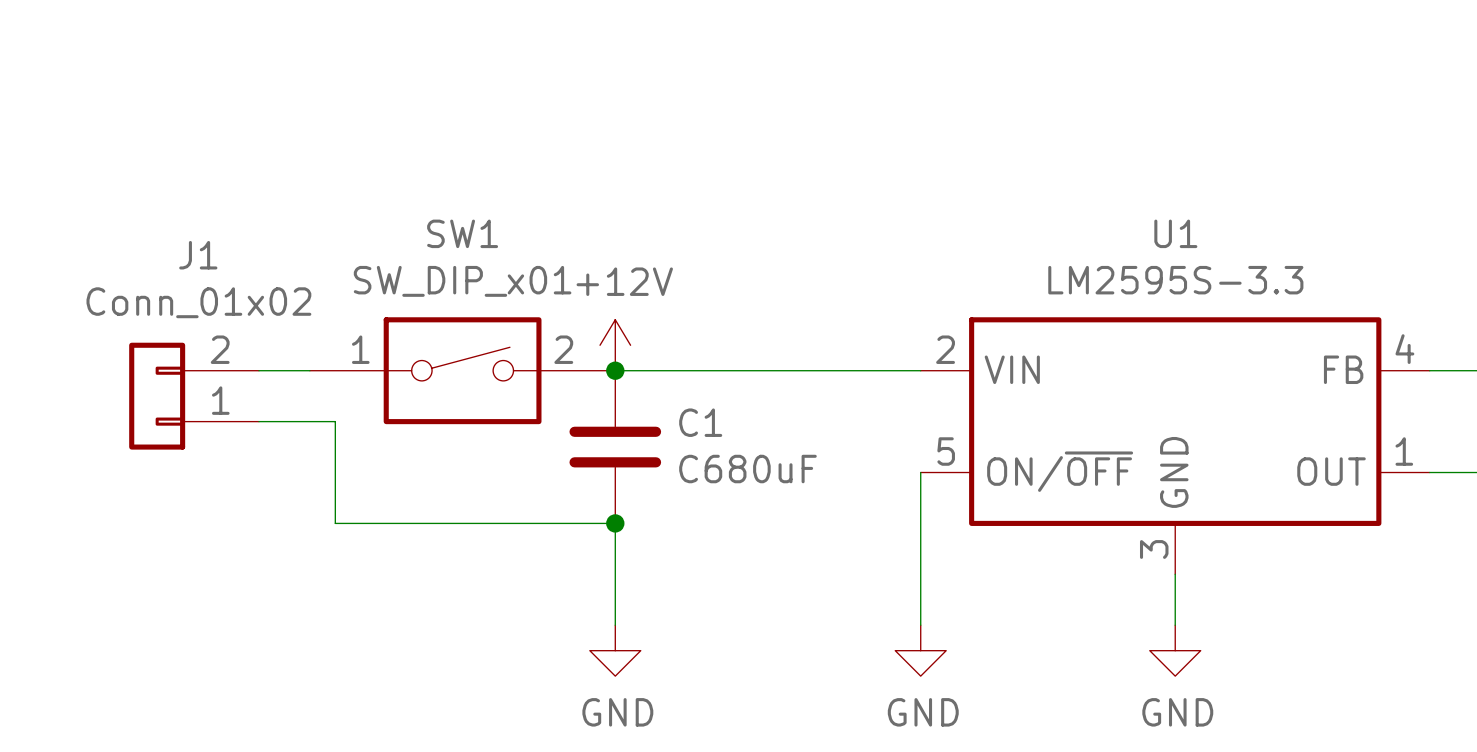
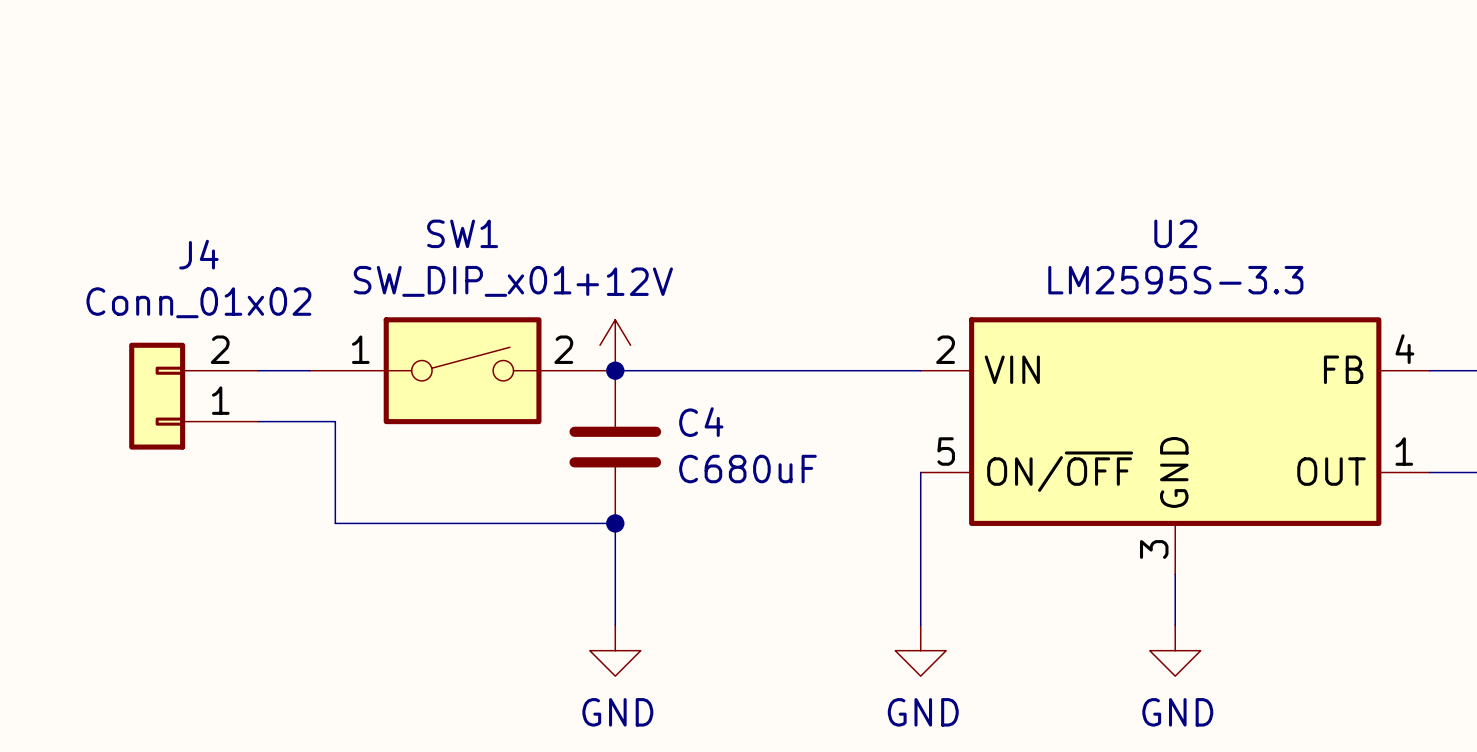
U1 name: U1 (1175, 233) -> U2 (1175, 233)
J1 name: J1 (198, 255) -> J4 (198, 254)
C1 name: C1 (700, 422) -> C4 (701, 422)

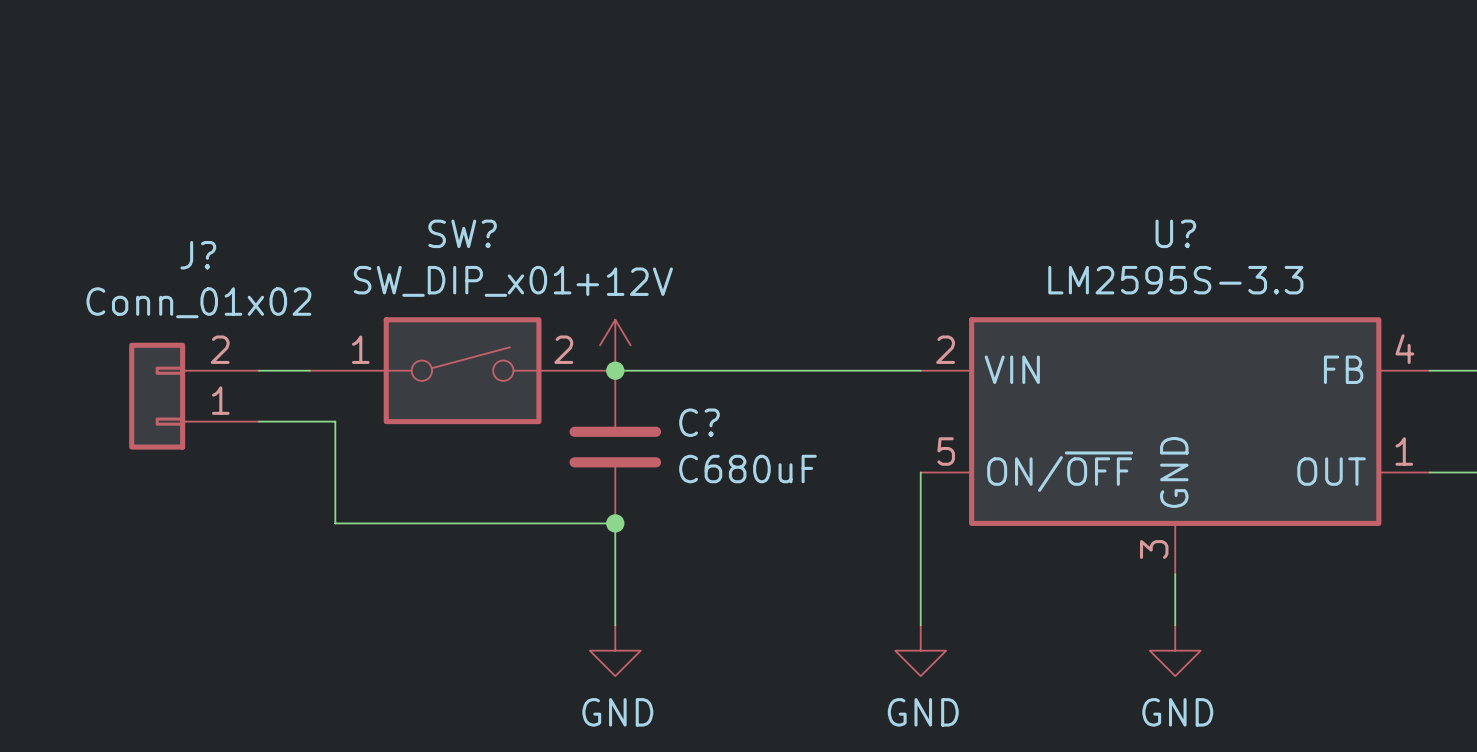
SW1 name: SW1 (462, 233) -> SW? (462, 233)
U2 name: U2 (1175, 233) -> U? (1175, 233)
J4 name: J4 (198, 254) -> J? (198, 255)
C4 name: C4 (701, 422) -> C? (699, 422)

